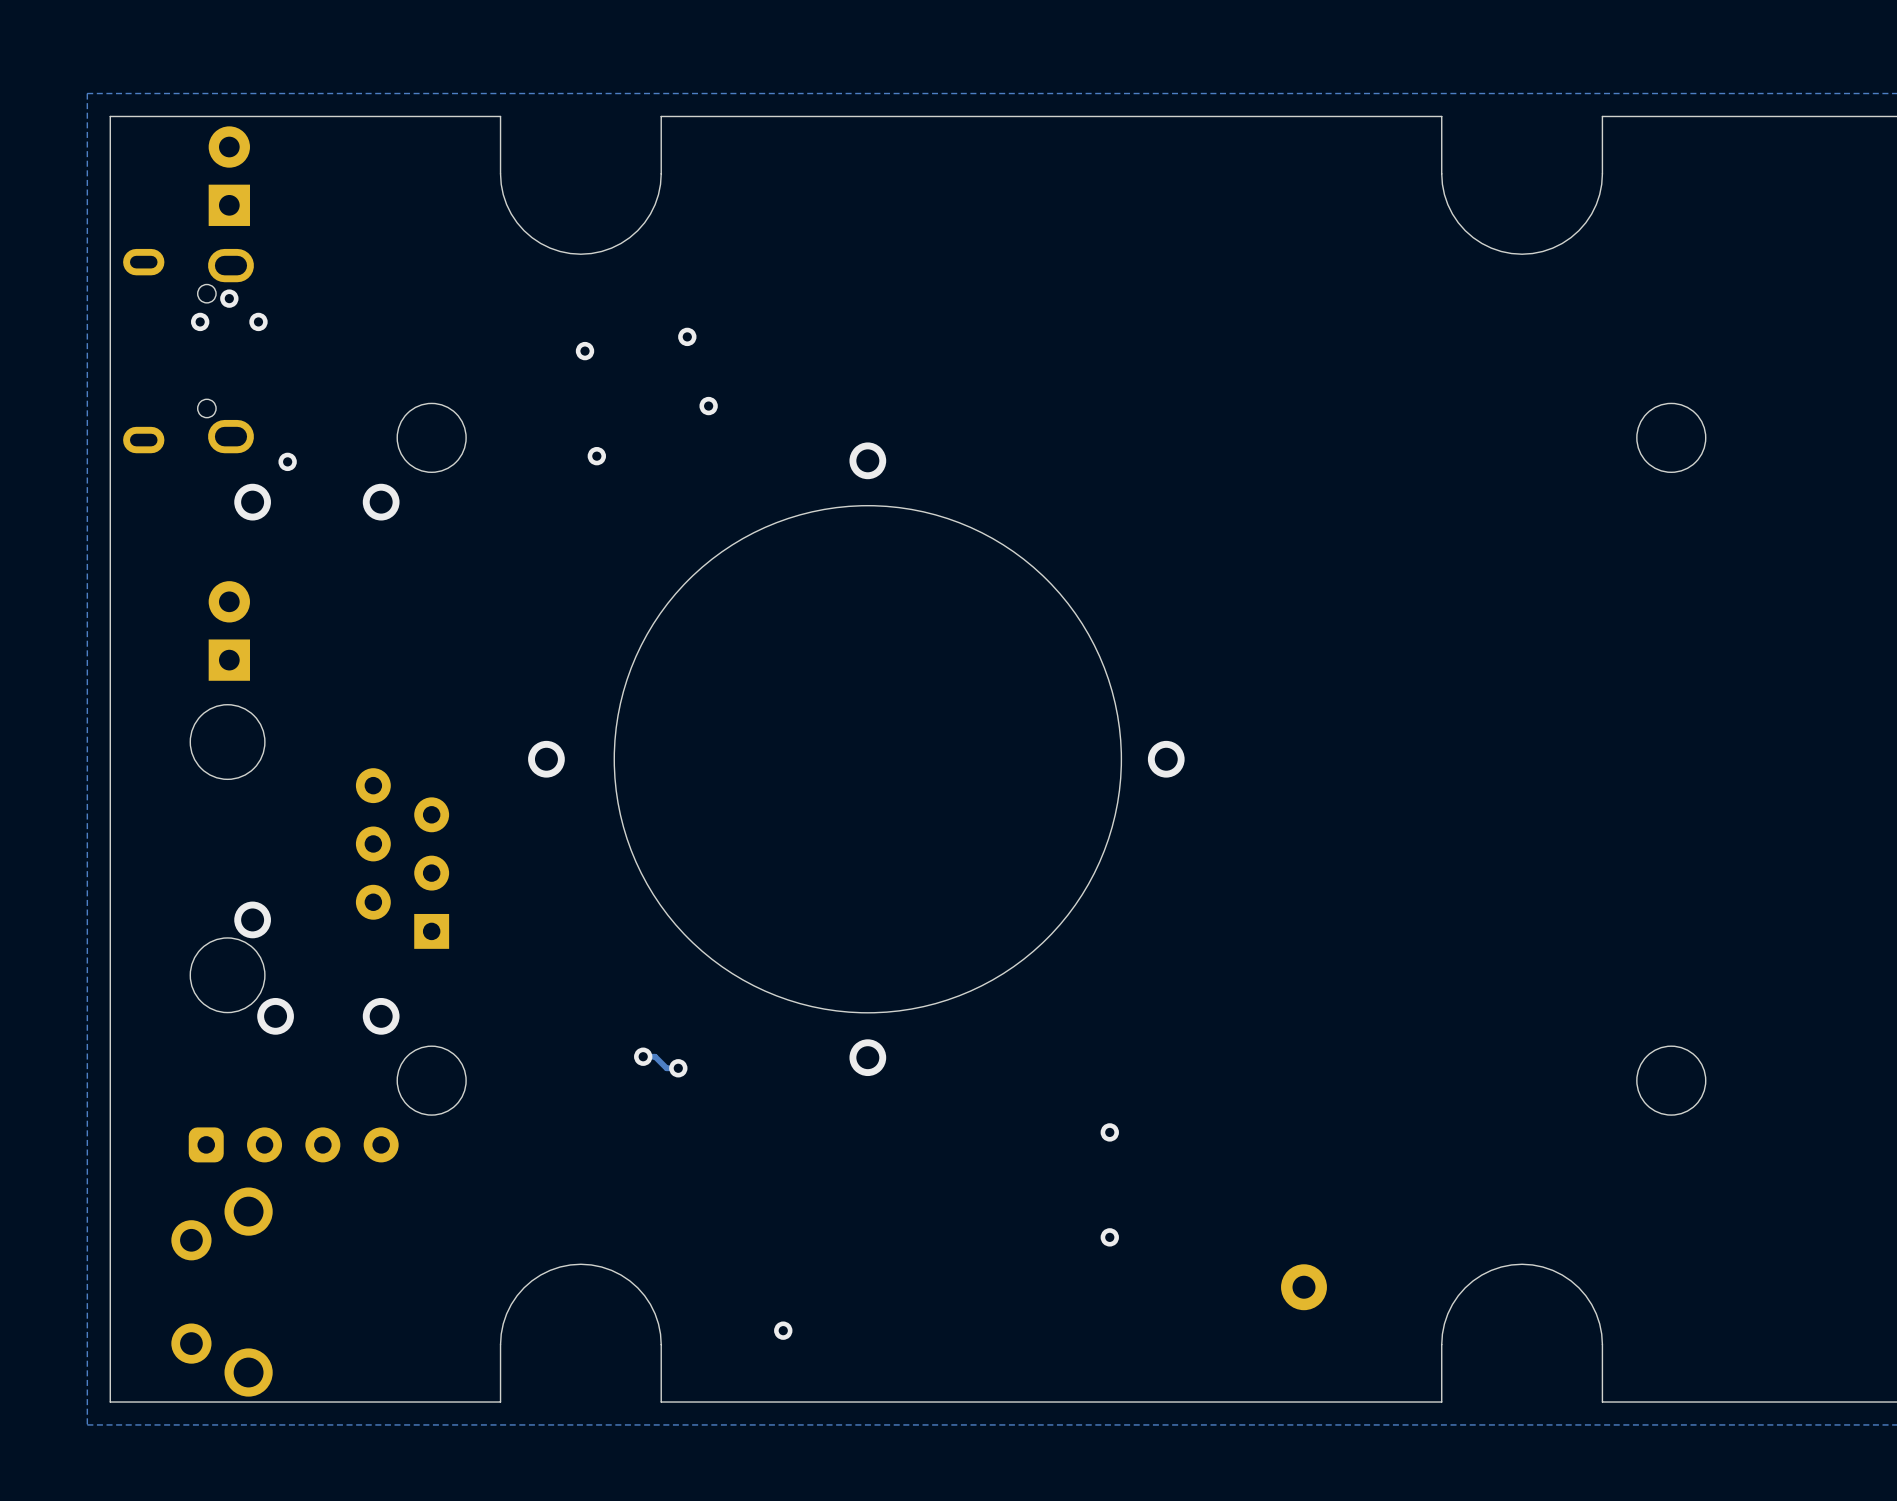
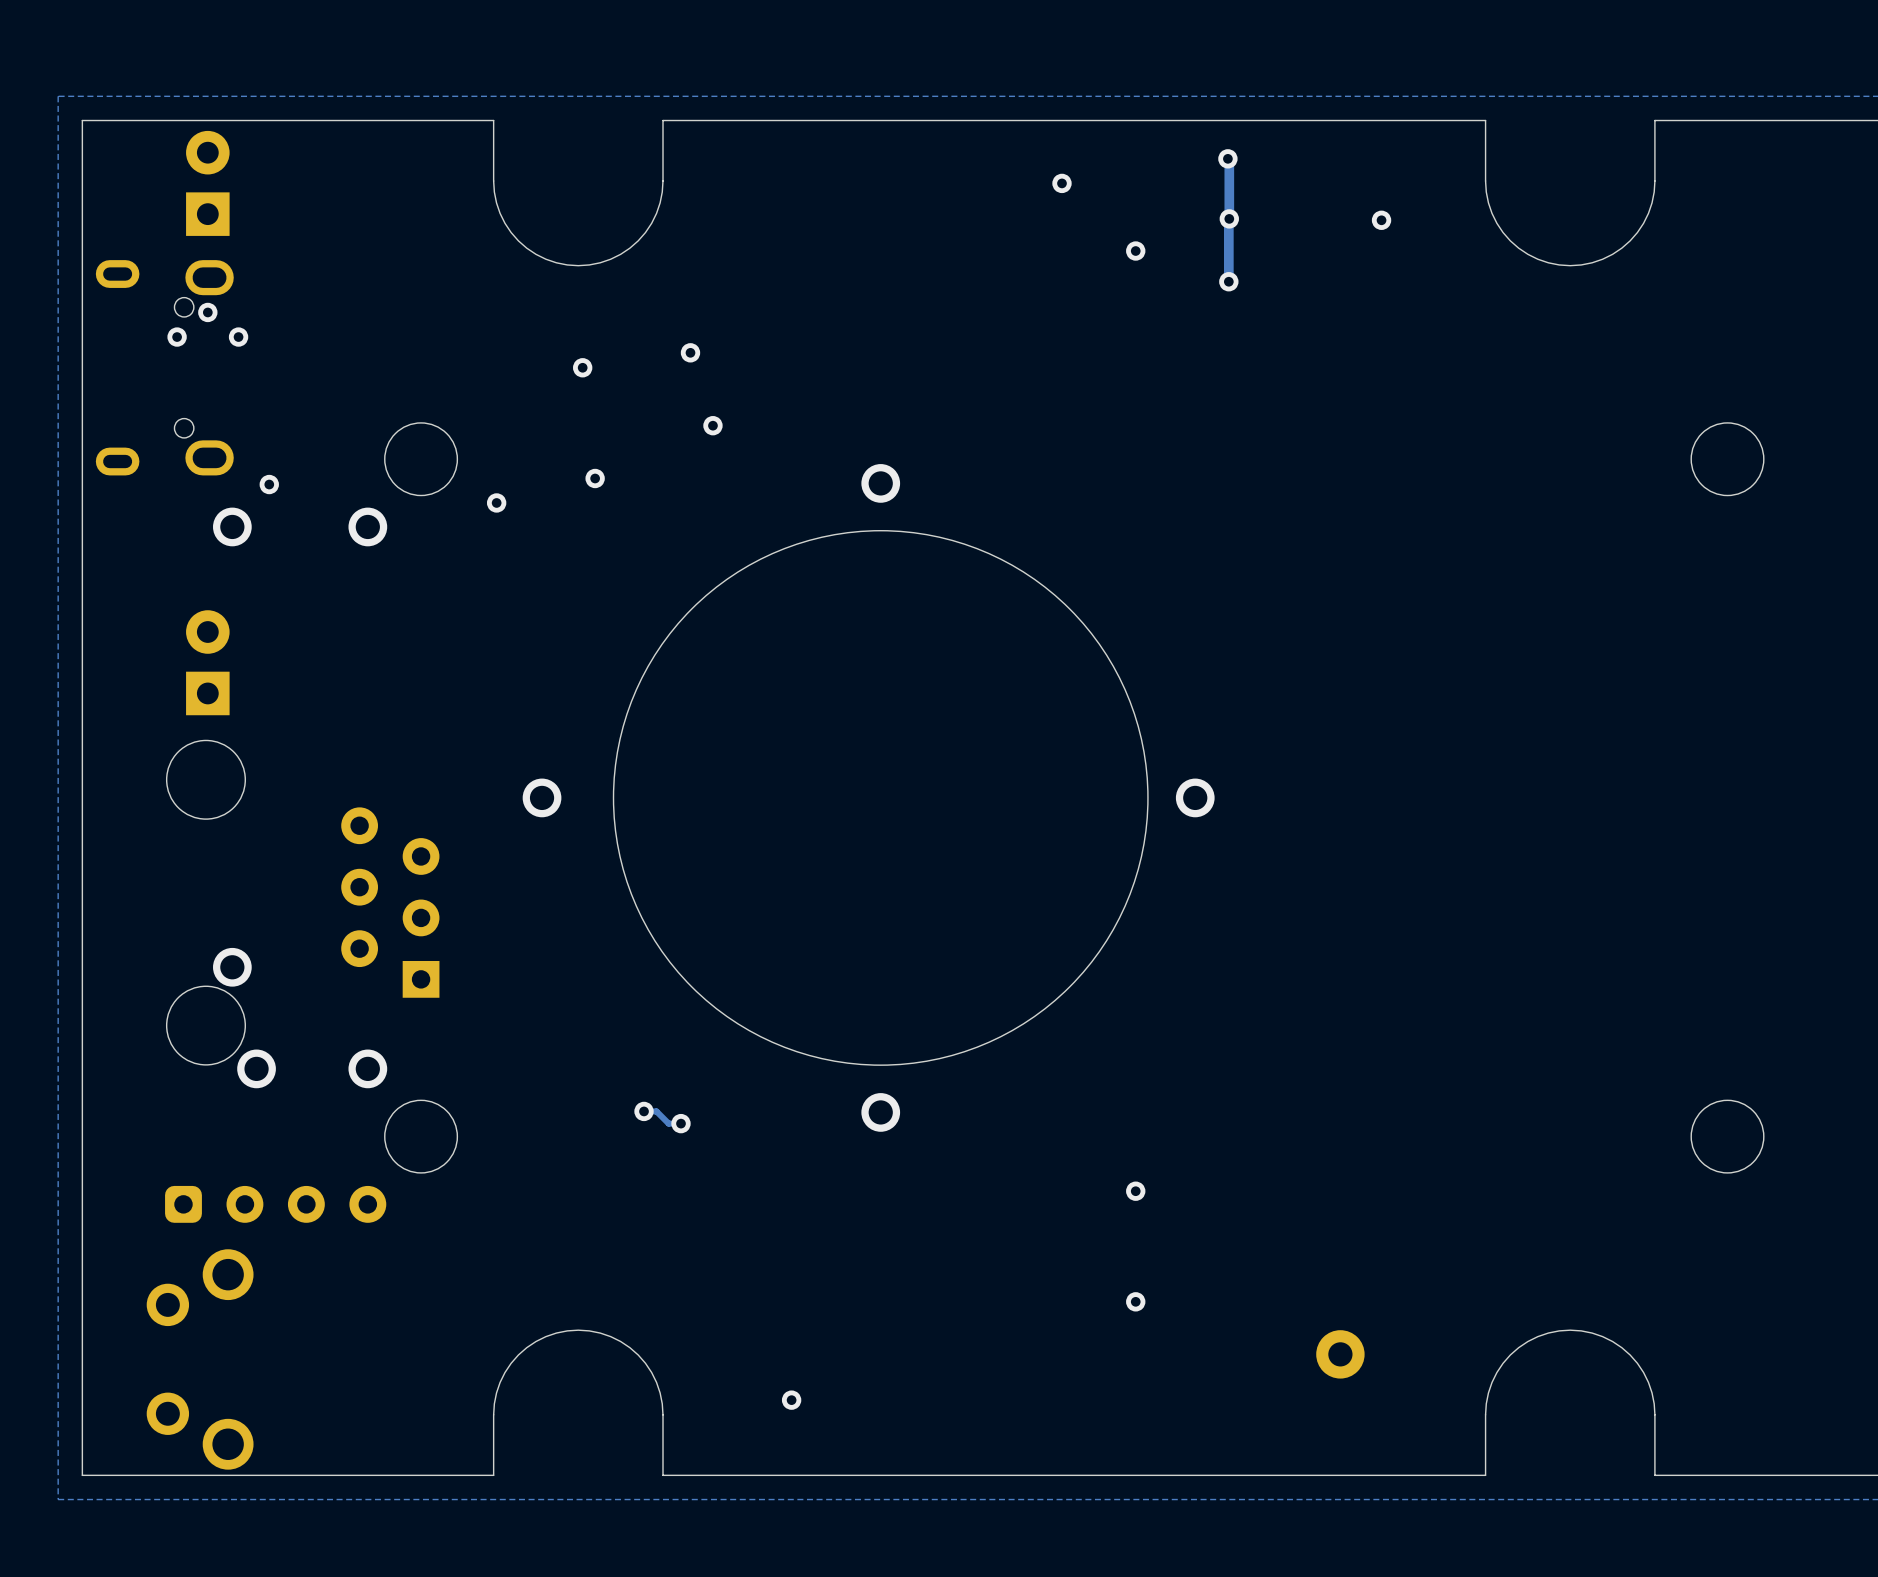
track: none -> (1227, 158) (1228, 281)
via: none -> (1227, 158)
via: none -> (1061, 183)
via: none -> (1229, 218)
via: none -> (1381, 220)
via: none -> (1135, 251)
via: none -> (1228, 281)
via: none -> (496, 502)

